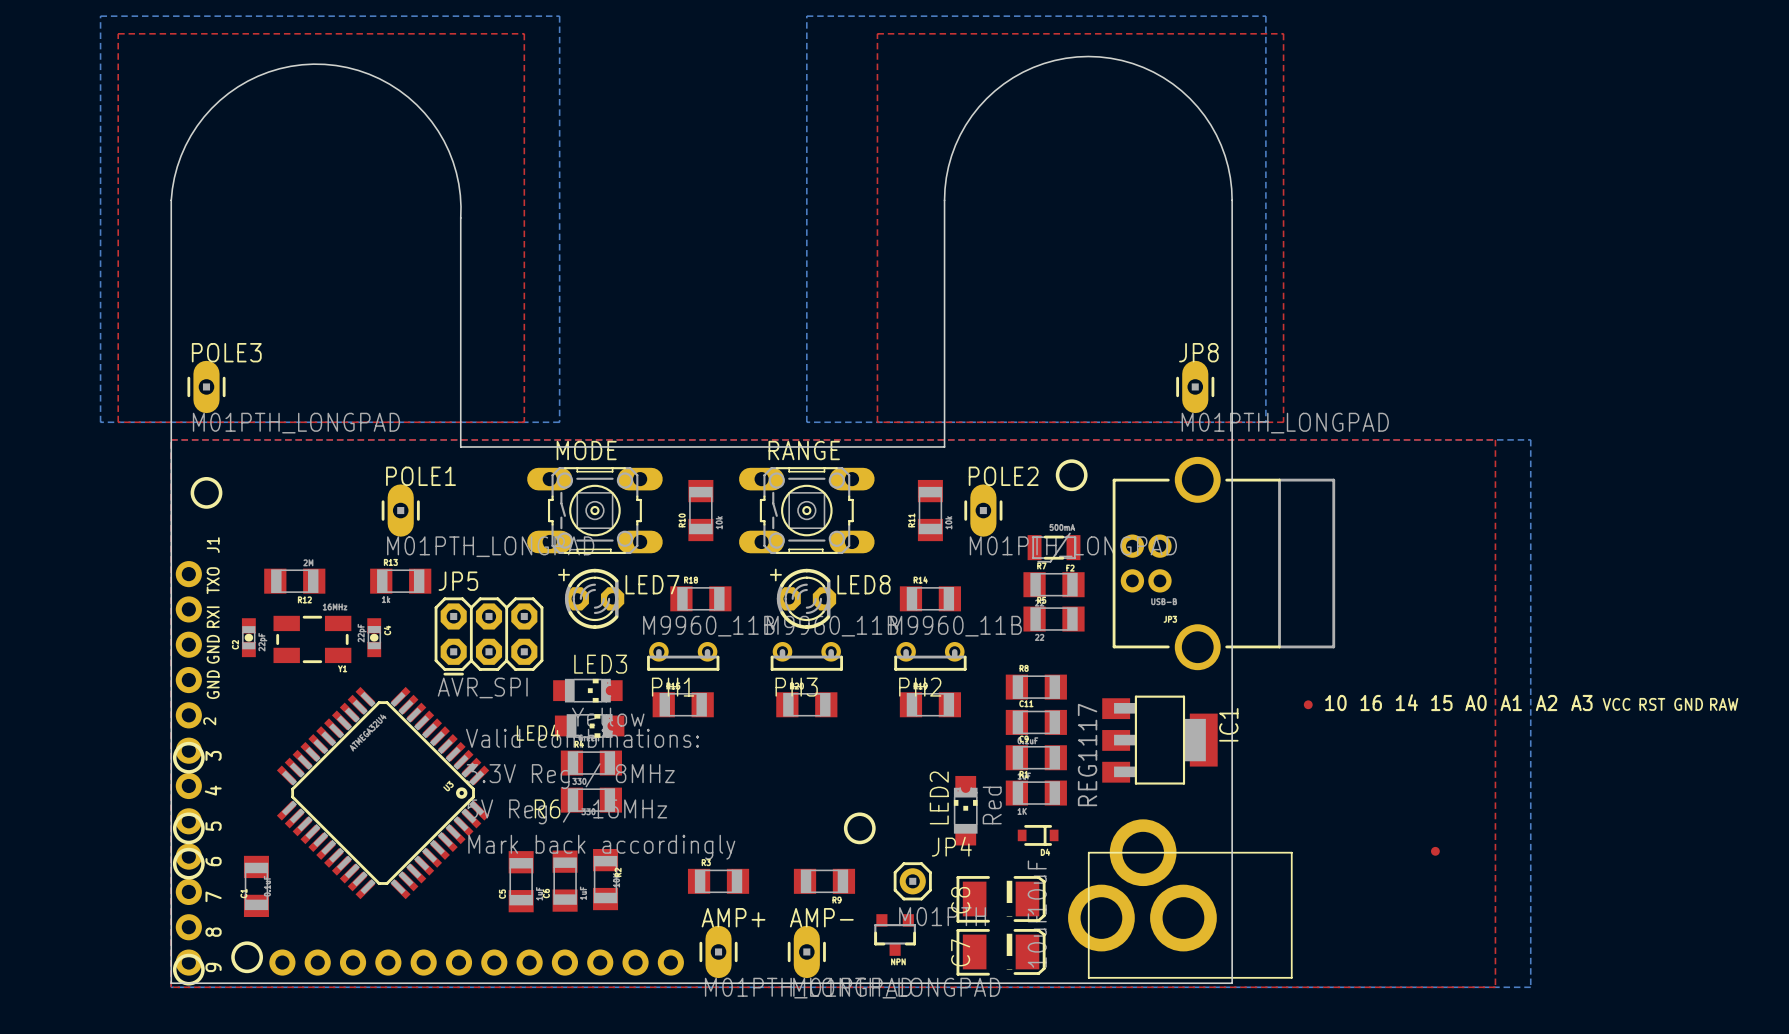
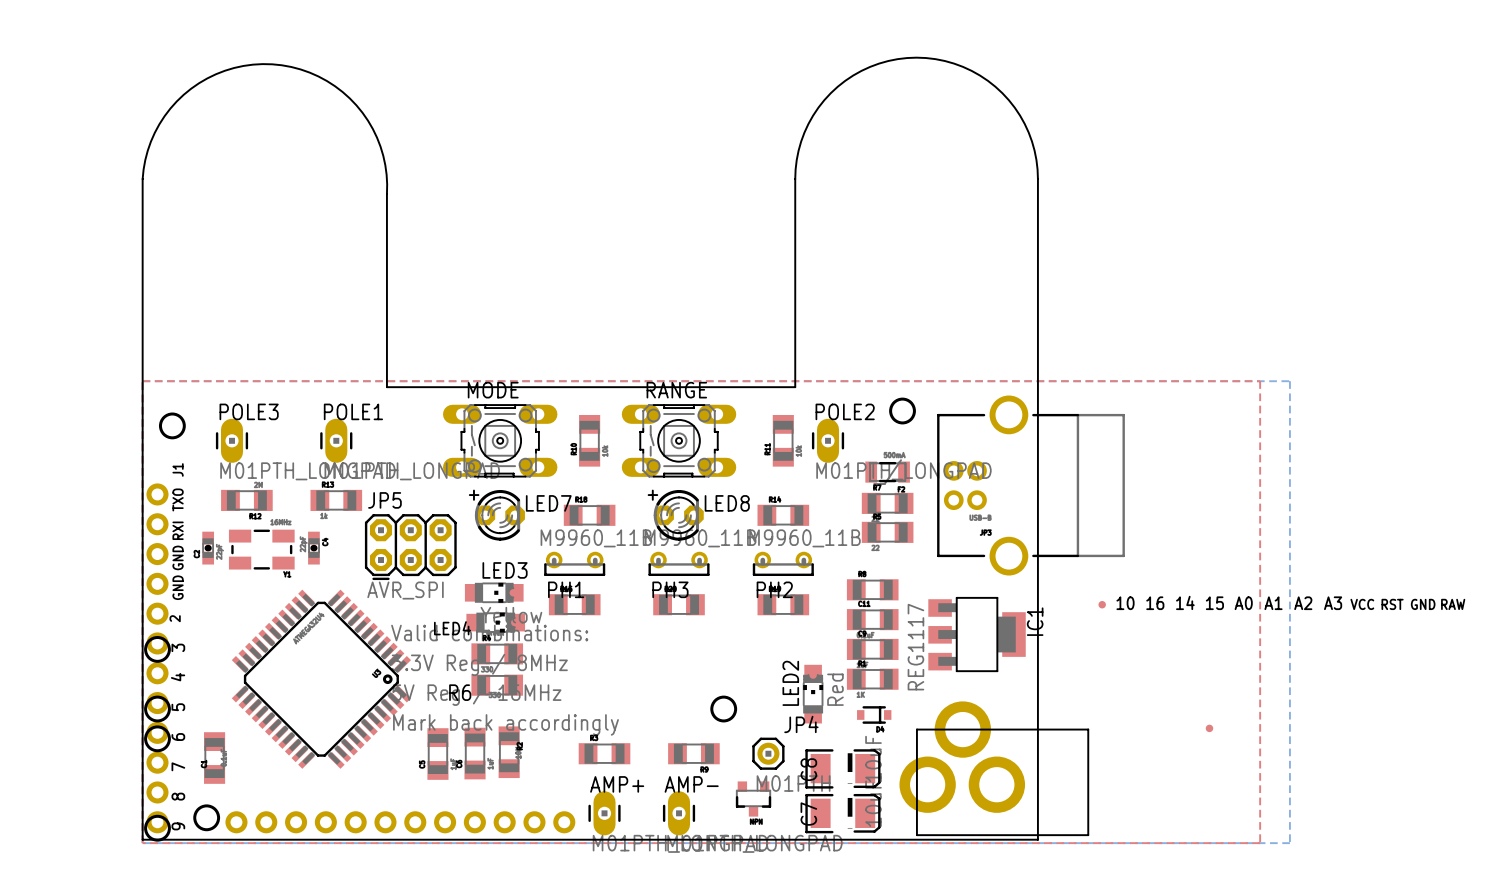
bottom zone outline: (100, 16) (559, 16) (559, 422) (100, 422) (100, 16) -> none
bottom zone outline: (806, 16) (1265, 16) (1265, 422) (806, 422) (806, 16) -> none
top zone outline: (118, 33) (524, 33) (524, 422) (118, 422) (118, 33) -> none
top zone outline: (877, 33) (1283, 33) (1283, 422) (877, 422) (877, 33) -> none
POLE3 position: (206, 386) -> (231, 440)
JP8: M01PTH_LONGPAD (1195, 386) -> none

